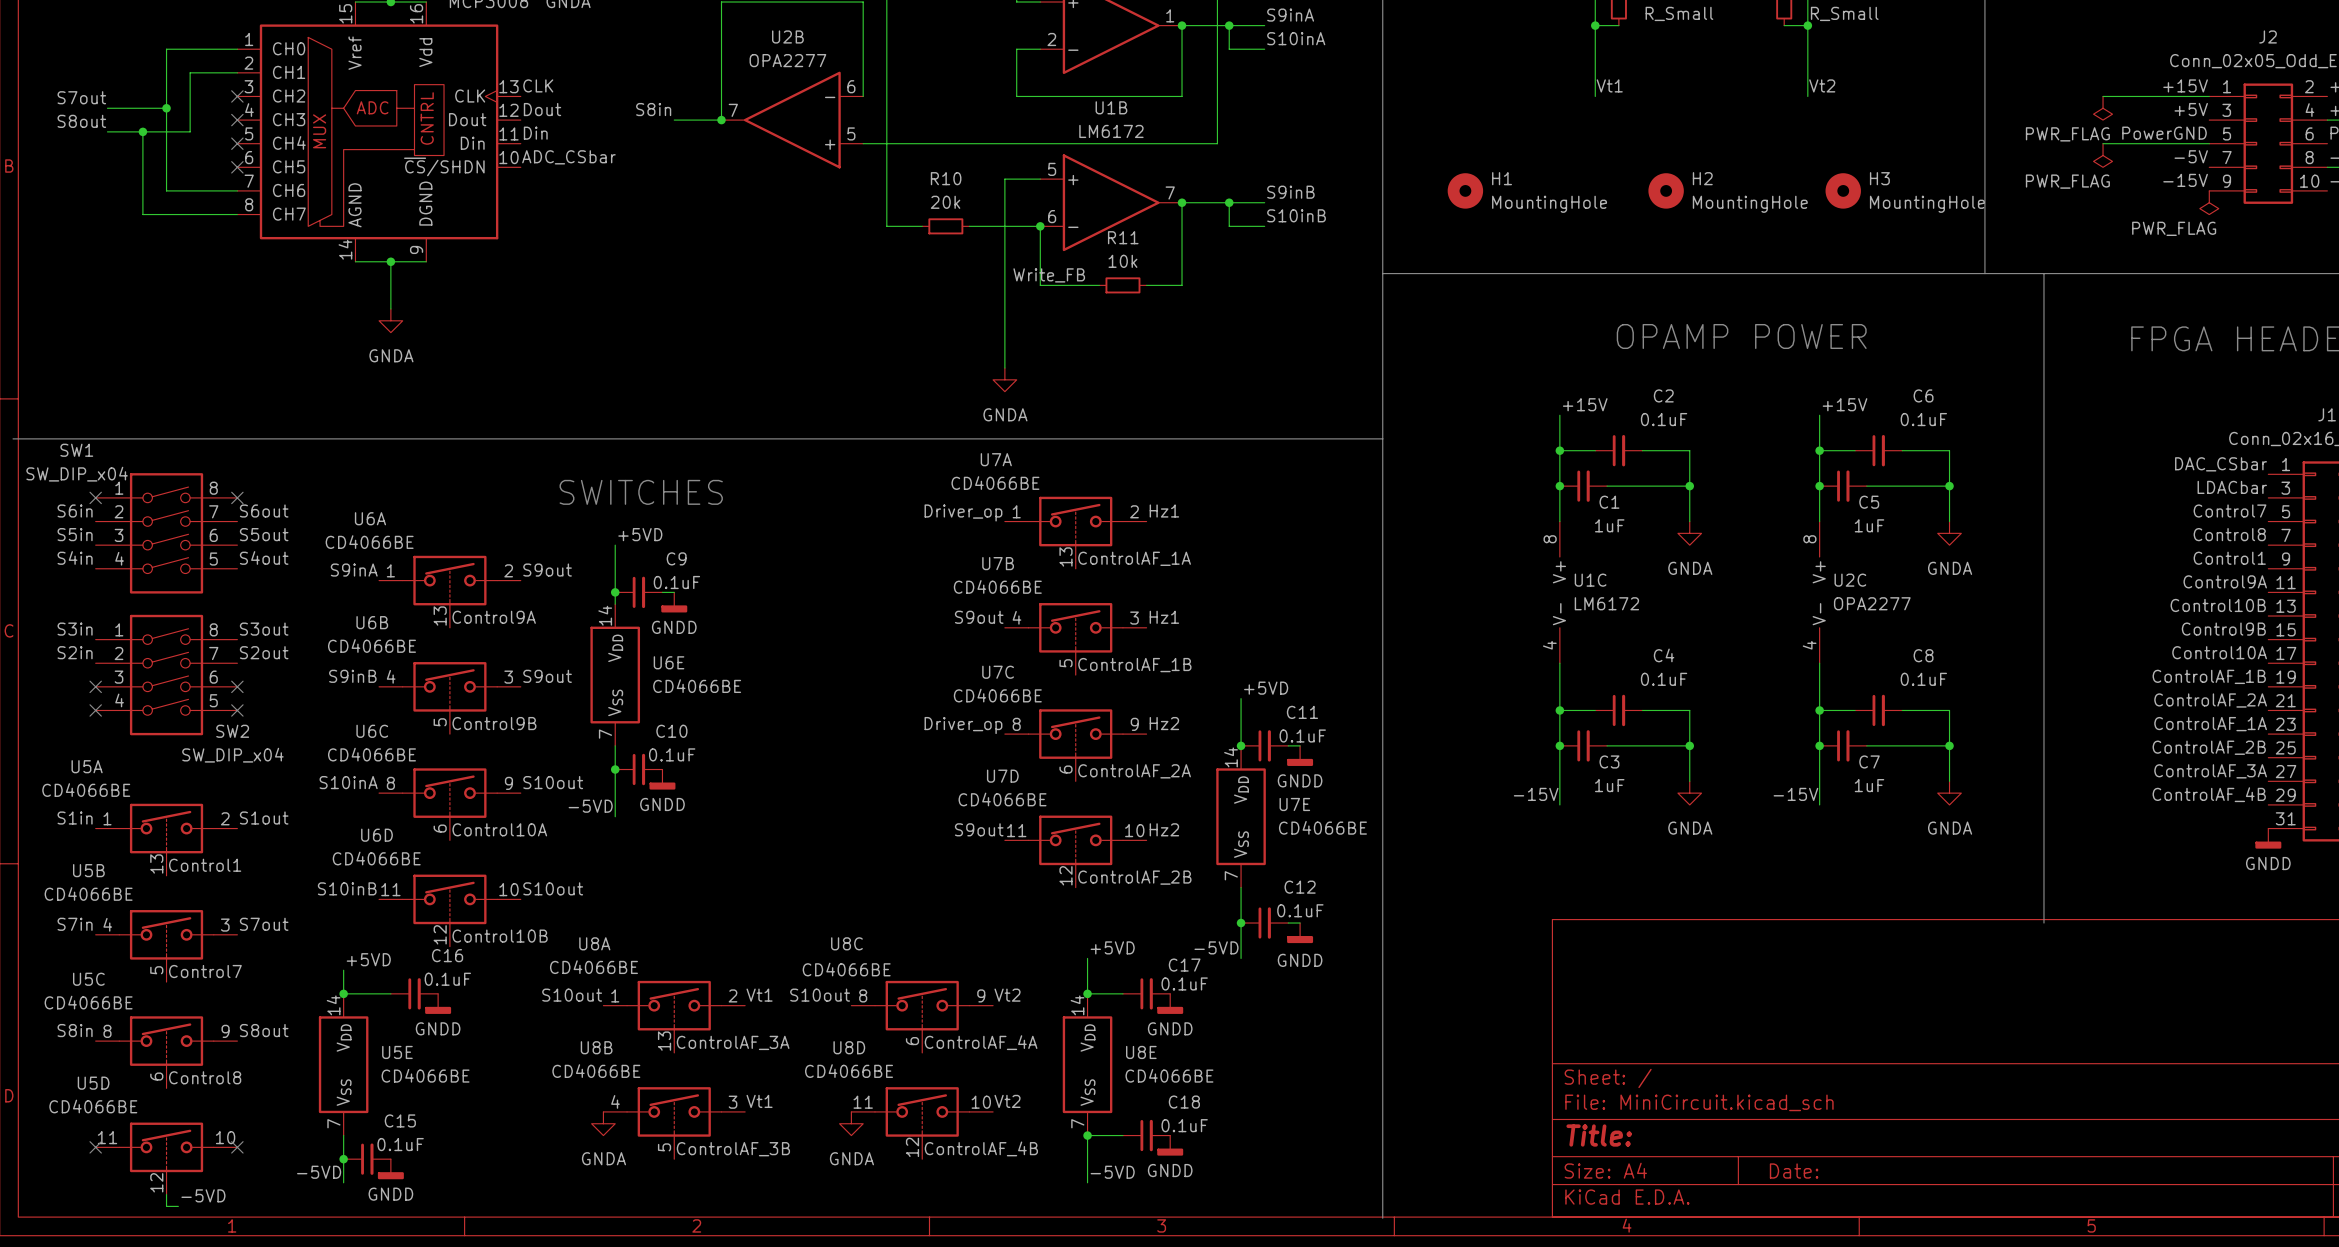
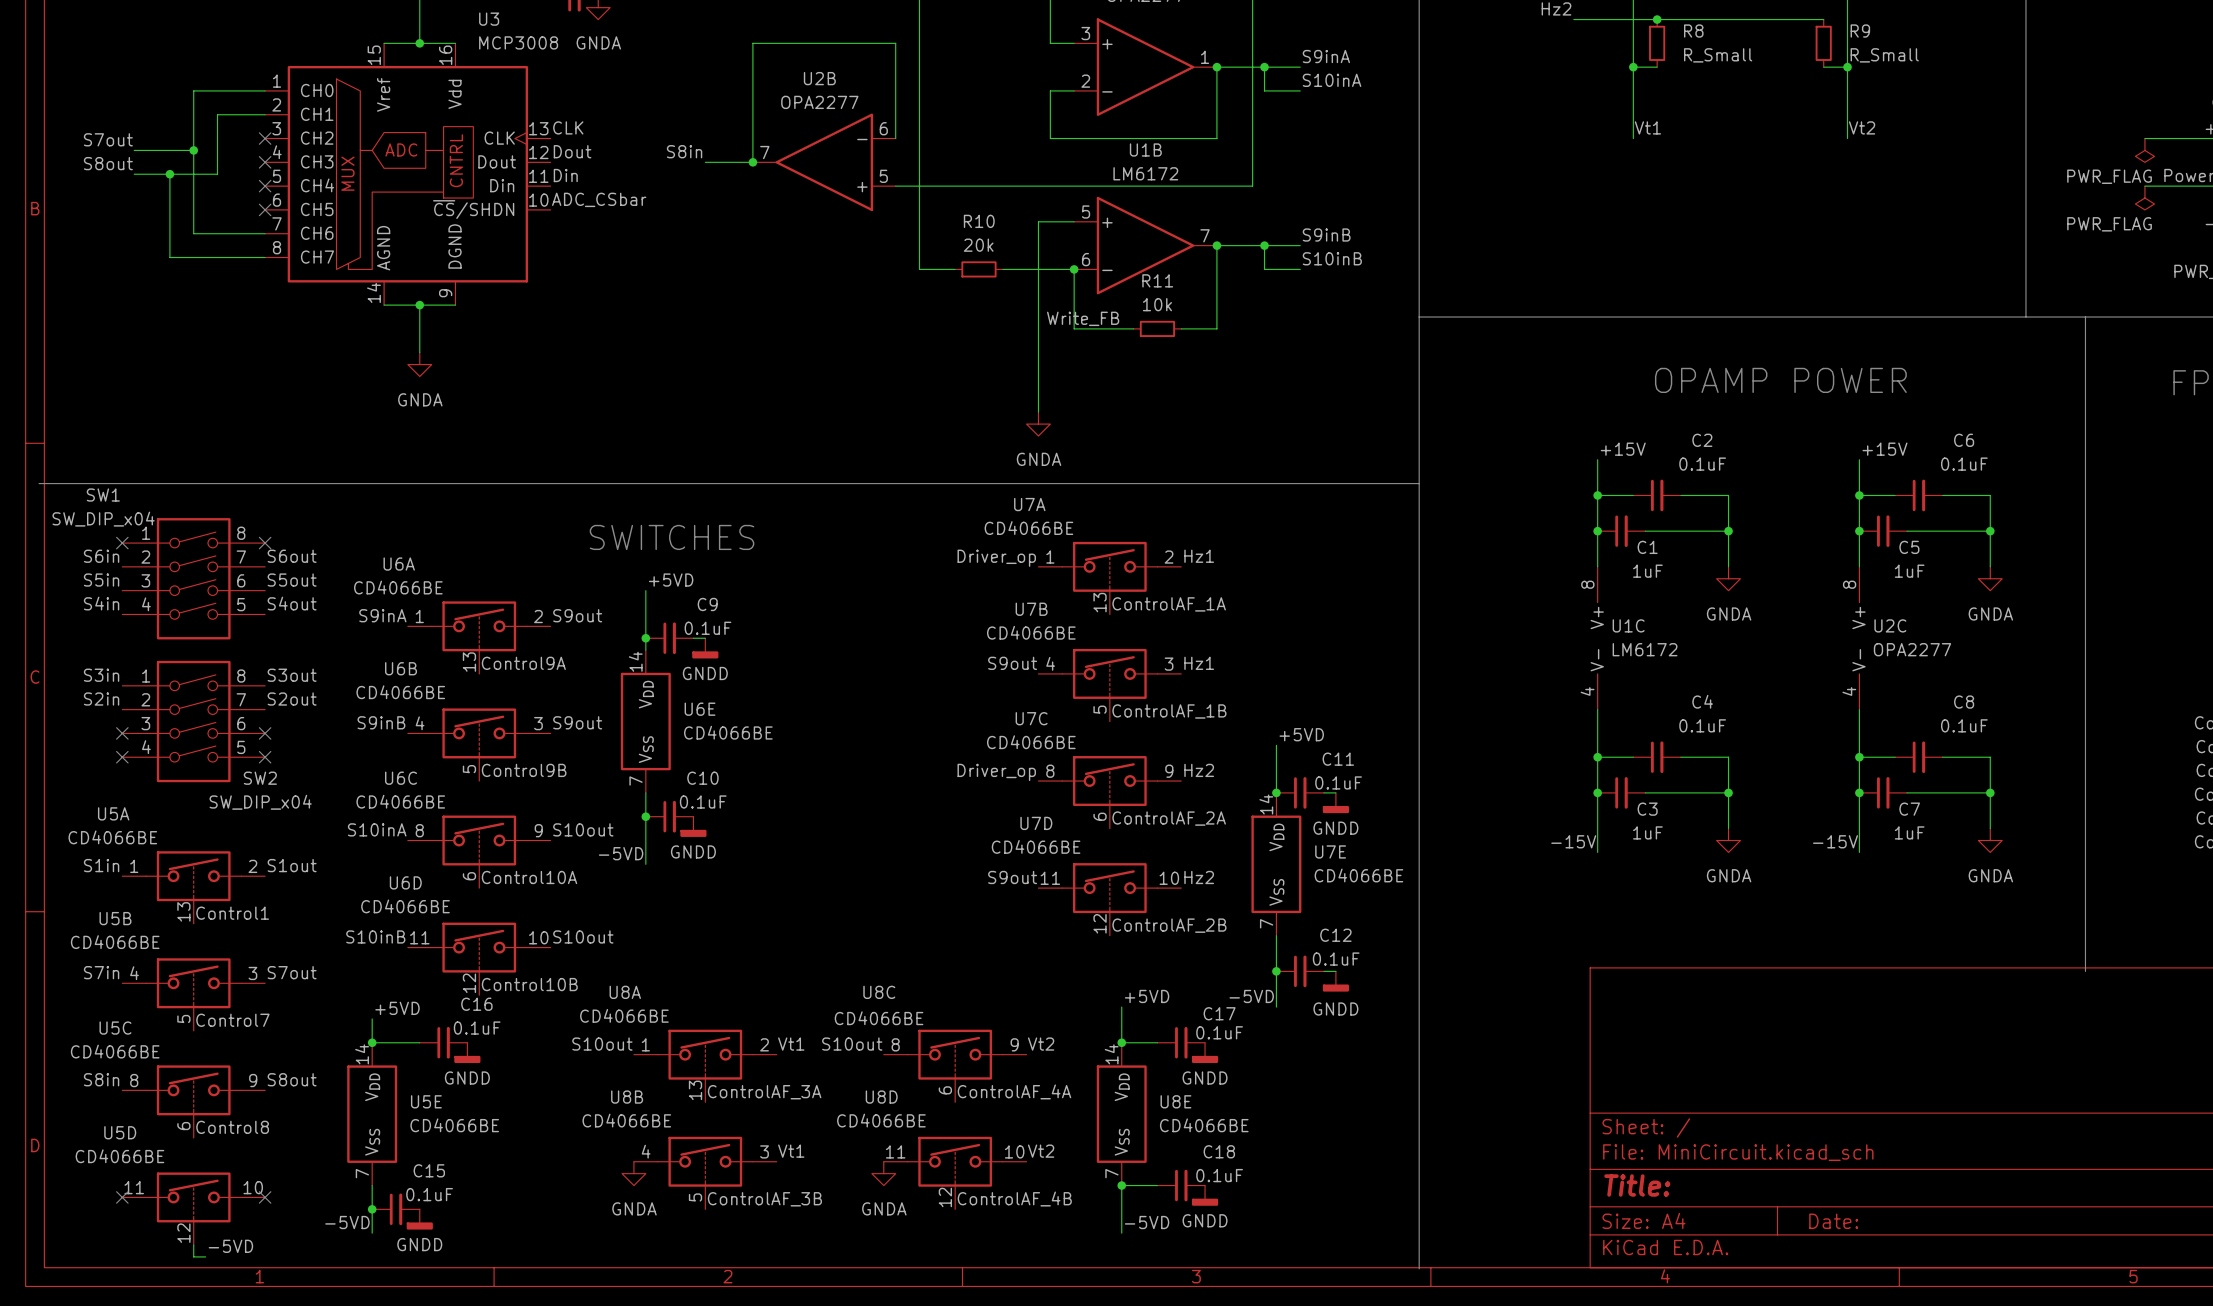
H1: MountingHole (1465, 190) -> none
H2: MountingHole (1666, 190) -> none
H3: MountingHole (1843, 190) -> none

